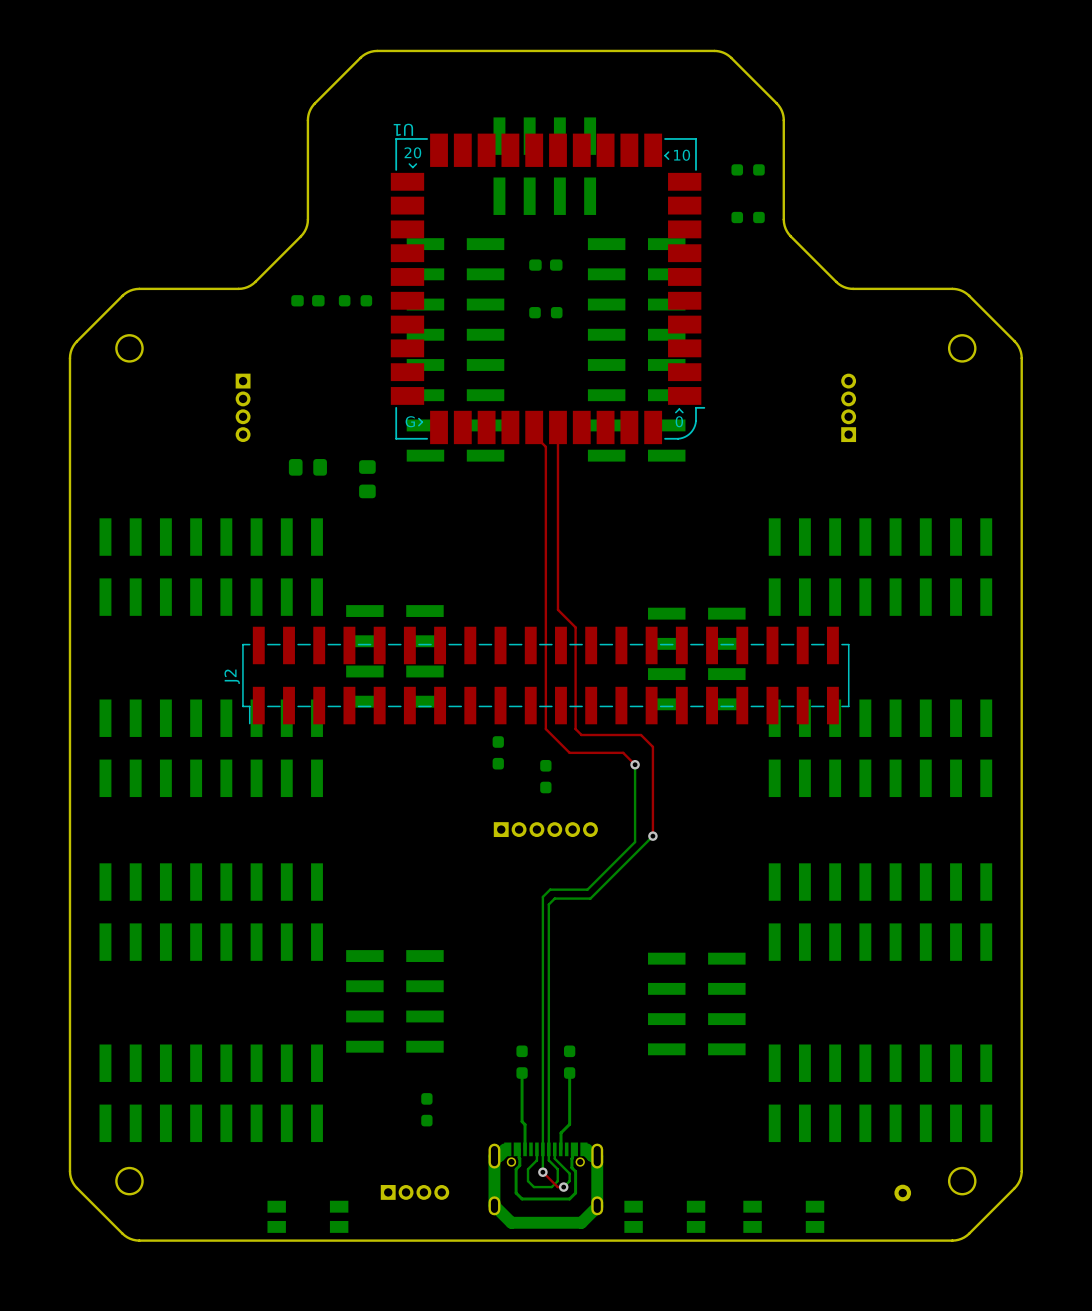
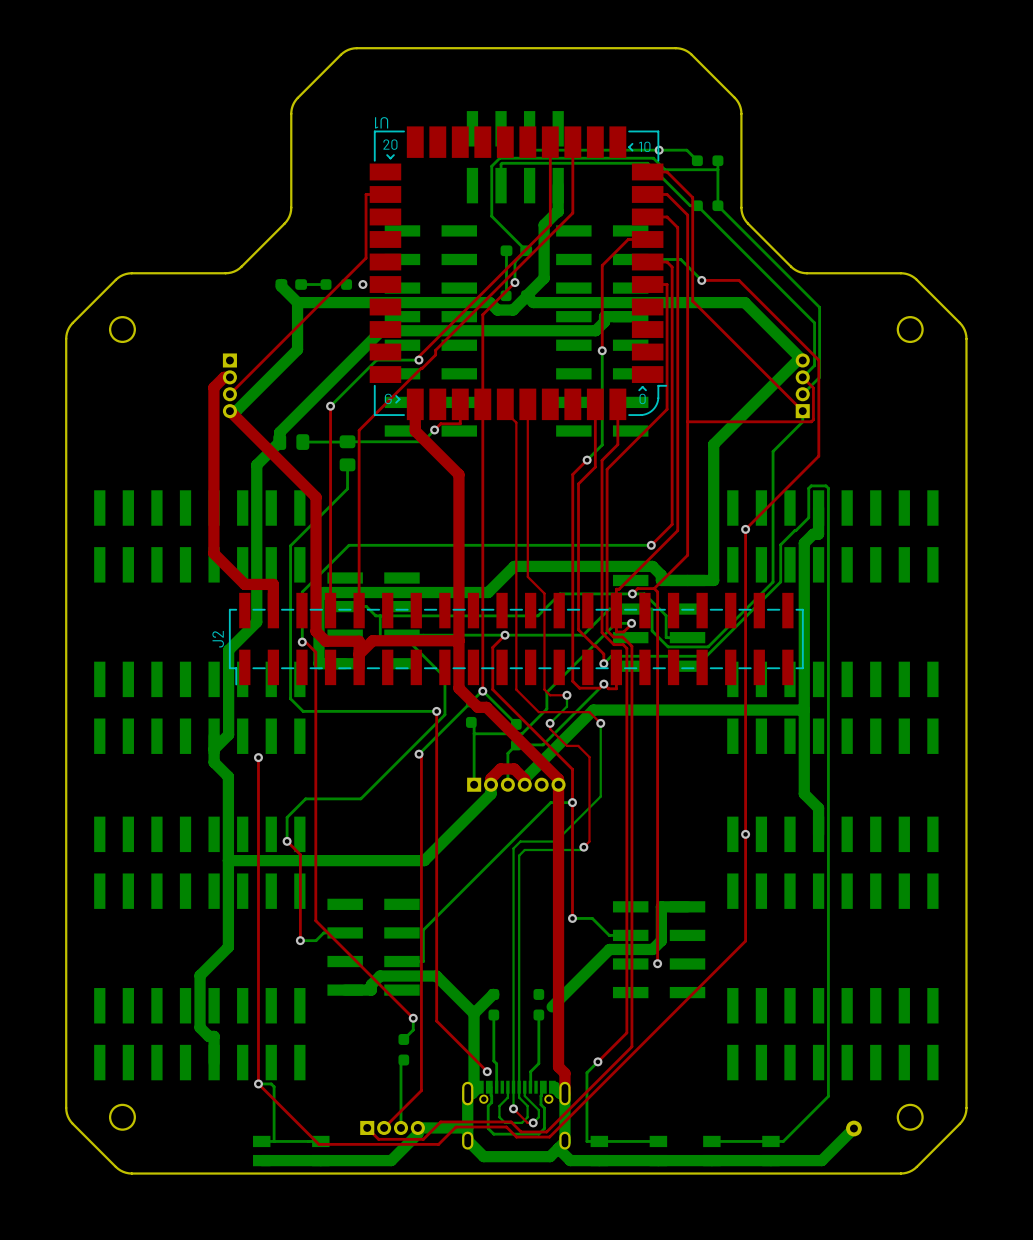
bottom track: none -> (529, 128) (529, 150) (686, 150) (697, 160)
top track: none -> (550, 142) (550, 225) (418, 356) (418, 360)
top track: none -> (572, 142) (572, 213) (435, 350) (435, 354) (359, 430) (359, 610)
via: none -> (659, 150)
bottom track: none -> (717, 160) (717, 205) (819, 307) (819, 377) (802, 394)
bottom track: none -> (717, 169) (664, 169) (653, 158) (499, 158) (491, 166) (491, 216) (526, 250) (514, 261) (514, 282)
top track: none -> (647, 171) (667, 171) (692, 197) (692, 301) (802, 411)
bottom track: none -> (501, 185) (501, 163) (647, 163) (690, 205) (697, 205) (814, 322) (814, 365) (802, 377)
bottom track: none -> (558, 185) (558, 211) (544, 224) (544, 278) (527, 296)
top track: none -> (385, 194) (366, 194) (366, 258) (229, 394)
top track: none -> (647, 194) (667, 194) (687, 215) (687, 555) (654, 588)
top track: none -> (647, 216) (667, 216) (677, 227) (677, 530) (619, 589) (616, 589) (616, 631) (623, 631) (631, 623)
top track: none -> (647, 239) (628, 239) (602, 265) (602, 350)
bottom track: none -> (506, 250) (506, 295)
bottom track: none -> (630, 259) (680, 259) (701, 280)
top track: none -> (647, 262) (667, 262) (672, 267) (672, 524) (651, 545)
top track: none -> (701, 280) (739, 280) (818, 360) (818, 456) (745, 529) (745, 941) (549, 1137) (516, 1137) (506, 1127) (456, 1127) (438, 1144) (318, 1144) (258, 1083) (258, 757)
via: none -> (701, 280)
top track: none -> (514, 282) (482, 314) (482, 691)
via: none -> (514, 282)
bottom track: none -> (281, 284) (297, 302)
bottom track: none -> (301, 284) (326, 284)
via: none -> (362, 284)
top track: none -> (647, 284) (667, 284) (667, 409) (607, 469) (607, 630) (613, 637) (622, 637) (631, 646) (631, 1046) (546, 1132) (521, 1132) (511, 1121) (440, 1121) (423, 1139) (378, 1139) (367, 1127)
bottom track: none -> (527, 296) (533, 302) (744, 302) (802, 360) (797, 360) (713, 444) (713, 580) (661, 580) (661, 575) (652, 566) (514, 566) (488, 592) (323, 592) (318, 597) (318, 663) (345, 663)
bottom track: none -> (527, 296) (513, 310) (497, 310) (489, 302) (297, 302)
bottom track: none -> (297, 302) (297, 349) (236, 411) (229, 411)
bottom track: none -> (630, 316) (604, 316) (604, 321) (595, 330) (381, 330) (279, 432) (279, 442) (256, 465) (256, 622) (228, 650) (228, 734) (214, 749)
bottom track: none -> (602, 350) (602, 444) (587, 460)
via: none -> (602, 350)
bottom track: none -> (418, 360) (376, 360) (330, 406)
via: none -> (418, 360)
top track: none -> (229, 377) (224, 377) (213, 387) (213, 553) (244, 584) (273, 584) (273, 610)
top track: none -> (802, 377) (813, 388) (813, 419) (811, 421) (687, 421)
top track: none -> (415, 404) (415, 430) (458, 474) (458, 688) (477, 707) (486, 707) (558, 779) (558, 1066) (564, 1073) (564, 1093)
top track: none -> (460, 404) (460, 423) (440, 423) (434, 429)
top track: none -> (595, 404) (595, 467) (578, 483) (578, 629) (603, 654) (603, 663)
top track: none -> (617, 404) (617, 444) (602, 460) (602, 632) (613, 644) (623, 644) (626, 648) (626, 1032) (597, 1061)
top track: none -> (330, 406) (330, 610)
via: none -> (330, 406)
top track: none -> (229, 411) (316, 497) (316, 631) (325, 641) (359, 641) (359, 667)
bottom track: none -> (802, 411) (802, 421) (773, 451) (773, 582) (708, 646) (668, 646) (652, 630) (652, 609) (609, 609) (583, 635) (401, 635)
bottom track: none -> (434, 429) (422, 441) (302, 442)
via: none -> (434, 429)
top track: none -> (587, 460) (572, 474) (572, 681) (579, 688) (599, 688) (603, 684) (608, 688) (616, 688) (616, 667)
via: none -> (587, 460)
bottom track: none -> (347, 464) (347, 488) (290, 545) (290, 698) (303, 711) (436, 711)
bottom track: none -> (818, 508) (818, 534) (813, 534) (804, 543) (804, 793) (818, 808) (818, 834)
via: none -> (745, 529)
bottom track: none -> (651, 545) (349, 545) (302, 592) (302, 642)
via: none -> (651, 545)
top track: none -> (654, 588) (637, 588) (632, 593)
top track: none -> (654, 588) (657, 591) (657, 963)
via: none -> (632, 593)
bottom track: none -> (345, 606) (366, 606) (375, 615) (538, 615) (560, 593) (644, 593) (666, 615) (666, 637) (687, 637)
bottom track: none -> (380, 615) (380, 642) (382, 644) (411, 644) (444, 677) (444, 714) (360, 798) (305, 798) (287, 817) (287, 841)
bottom track: none -> (631, 623) (615, 623) (546, 692) (546, 708) (522, 733) (474, 733)
via: none -> (631, 623)
top track: none -> (505, 635) (492, 647) (492, 689) (572, 769) (572, 918)
via: none -> (505, 635)
top track: none -> (458, 640) (372, 640) (359, 654)
top track: none -> (302, 642) (305, 642) (315, 652) (315, 920) (413, 1018)
via: none -> (302, 642)
bottom track: none -> (603, 663) (611, 656) (706, 656) (780, 581) (780, 544) (808, 517) (808, 488) (811, 485) (825, 485) (828, 488) (828, 1096) (783, 1141) (711, 1141)
via: none -> (603, 663)
bottom track: none -> (603, 684) (543, 744) (516, 744) (507, 753) (507, 784)
via: none -> (603, 684)
via: none -> (482, 691)
bottom track: none -> (566, 695) (566, 706) (550, 723)
top track: (599, 735) (641, 735) (652, 746) (652, 836) -> none
via: none -> (566, 695)
bottom track: none -> (804, 710) (593, 710) (524, 778) (524, 784)
top track: none -> (436, 711) (436, 1021) (487, 1071)
via: none -> (436, 711)
bottom track: none -> (471, 722) (474, 725) (474, 784)
top track: none -> (550, 723) (550, 729) (566, 745) (578, 745) (589, 757) (589, 841) (583, 847)
via: none -> (550, 723)
bottom track: none -> (516, 724) (482, 691) (419, 754)
bottom track: none -> (214, 736) (214, 762) (228, 776) (228, 947) (200, 975) (200, 1027) (208, 1036) (214, 1036) (214, 1062)
top track: none -> (419, 754) (421, 756) (421, 1090) (384, 1127)
via: none -> (419, 754)
via: none -> (258, 757)
bottom track: none -> (491, 784) (491, 794) (424, 860) (228, 860)
top track: none -> (491, 784) (491, 778) (500, 768) (514, 768) (524, 779) (524, 784)
bottom track: (652, 836) (590, 898) -> (583, 847) (581, 850) (558, 850)
via: (652, 836) -> none
bottom track: none -> (572, 802) (550, 802) (423, 930) (423, 961) (401, 961)
via: none -> (572, 802)
via: none -> (745, 834)
top track: none -> (287, 841) (300, 854) (300, 940)
via: none -> (287, 841)
via: none -> (583, 847)
bottom track: none -> (687, 906) (661, 906) (661, 940) (652, 949) (609, 949) (552, 1006)
bottom track: none -> (572, 918) (592, 918) (609, 935) (630, 935)
via: none -> (572, 918)
bottom track: none -> (345, 932) (323, 932) (316, 940) (300, 940)
via: none -> (300, 940)
via: none -> (657, 963)
bottom track: none -> (345, 990) (371, 990) (371, 984) (380, 976) (436, 976) (474, 1013)
bottom track: none -> (493, 994) (474, 1013)
bottom track: none -> (474, 1013) (474, 1082) (476, 1084)
bottom track: none -> (413, 1018) (413, 1030) (403, 1039)
via: none -> (413, 1018)
bottom track: none -> (403, 1060) (400, 1062) (400, 1127)
bottom track: none -> (597, 1061) (586, 1072) (586, 1141) (658, 1141)
via: none -> (597, 1061)
via: none -> (487, 1071)
bottom track: none -> (258, 1083) (271, 1083) (274, 1086) (274, 1141)
via: none -> (258, 1083)
bottom track: none -> (467, 1127) (417, 1127) (417, 1134) (391, 1160) (261, 1160)
bottom track: none -> (853, 1128) (821, 1160) (570, 1160) (558, 1148)
bottom track: none -> (261, 1141) (320, 1141)

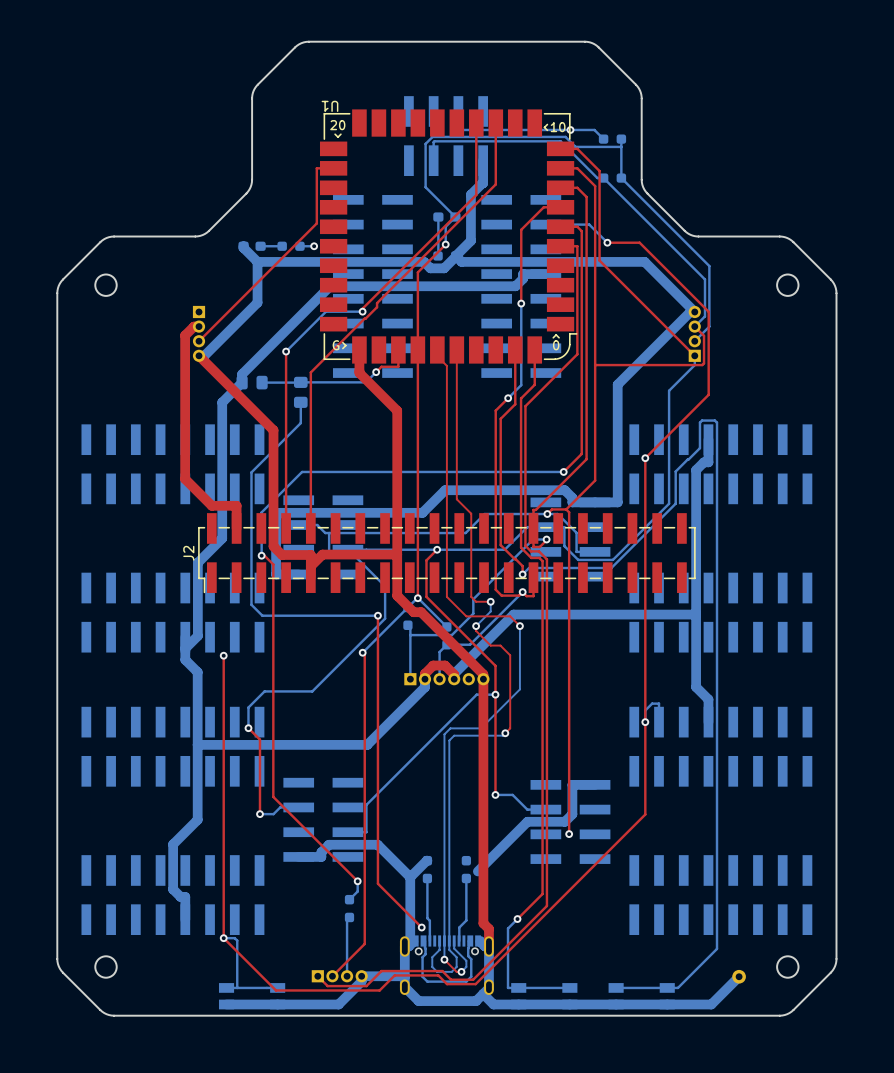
bottom track: none -> (299, 246) (314, 246)
bottom track: none -> (645, 722) (645, 710) (652, 703) (659, 703) (659, 722)

